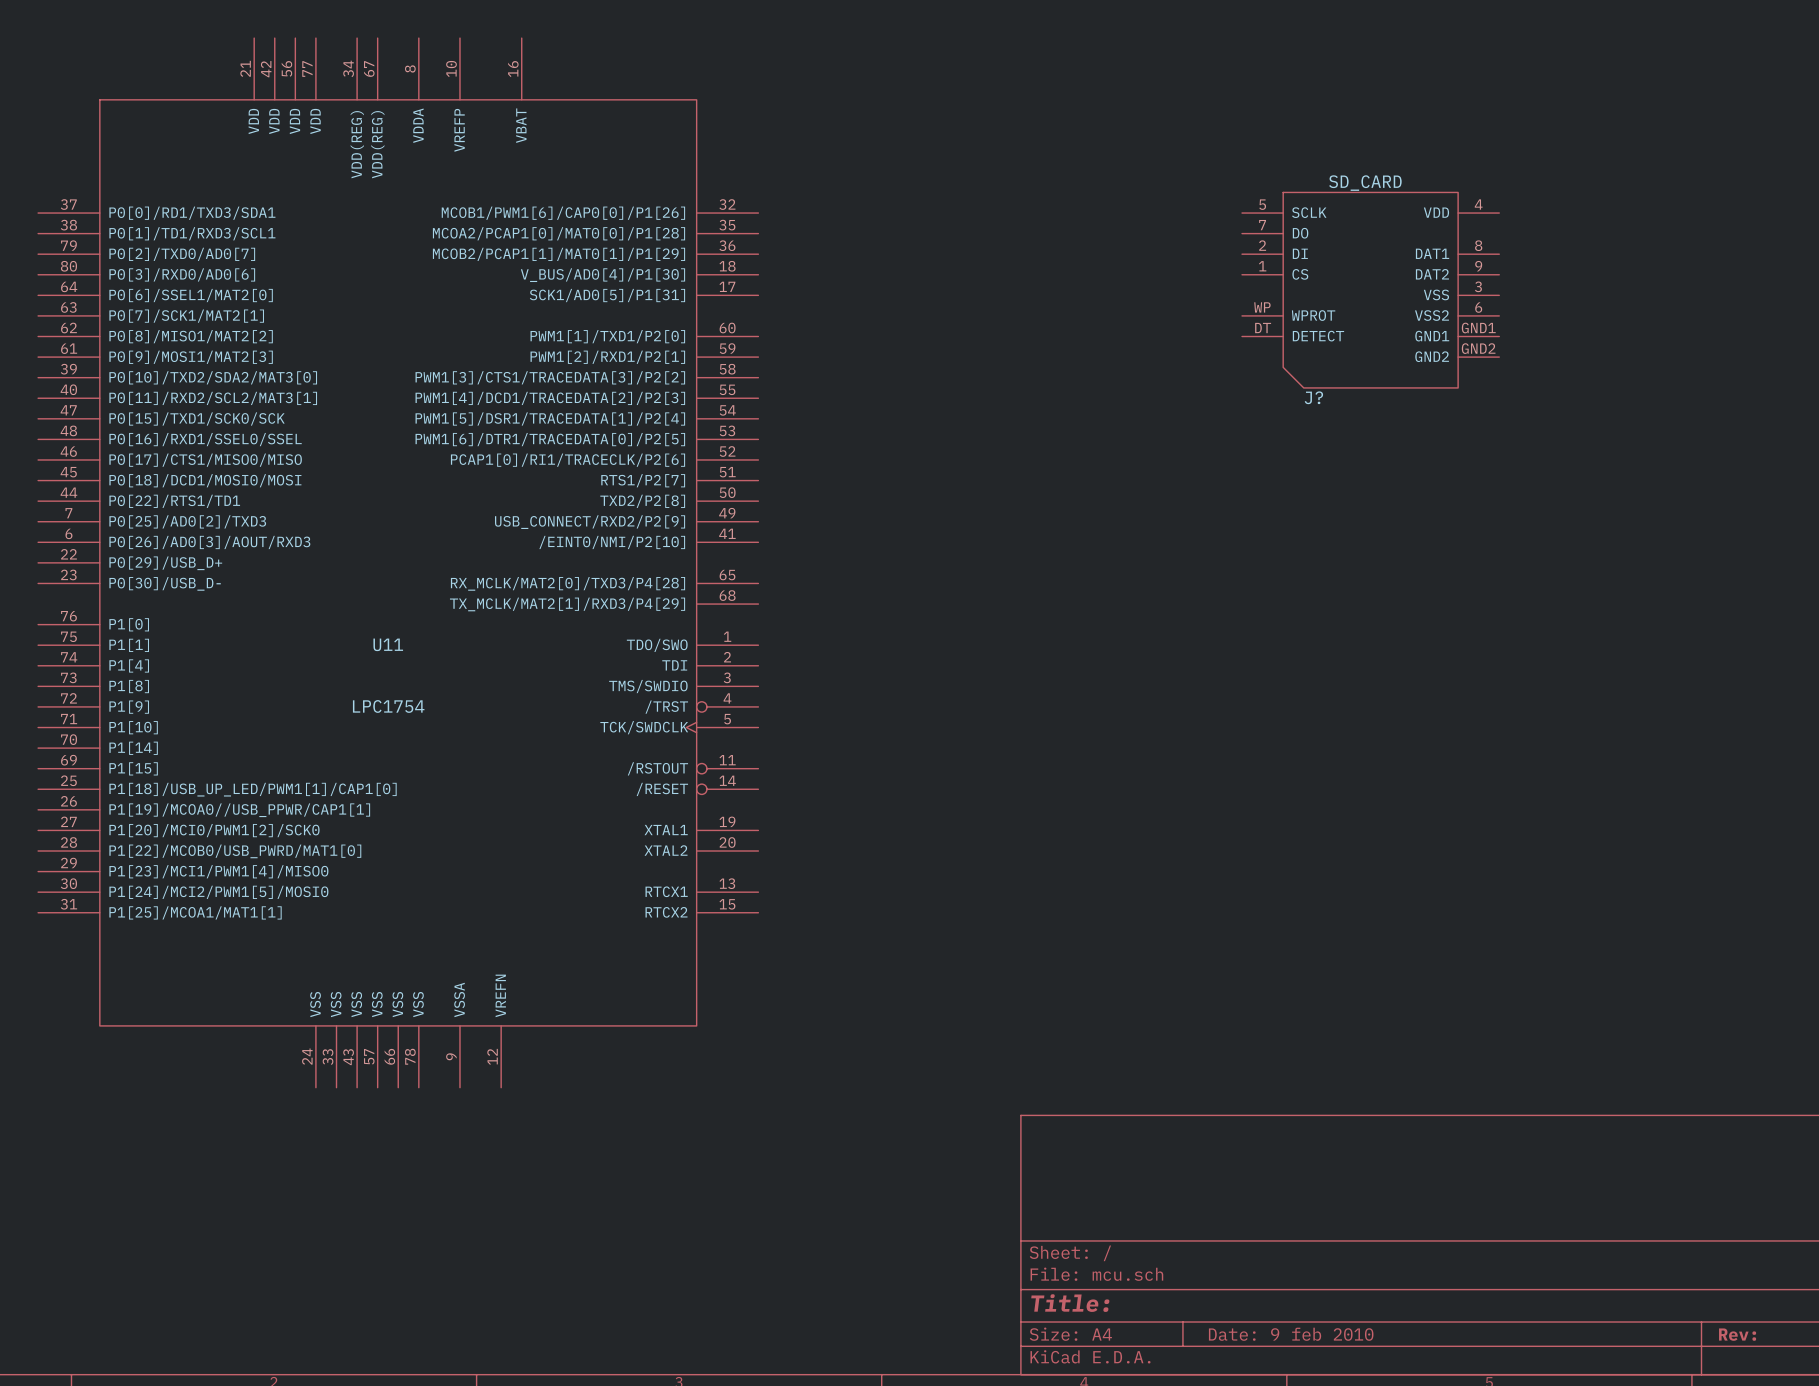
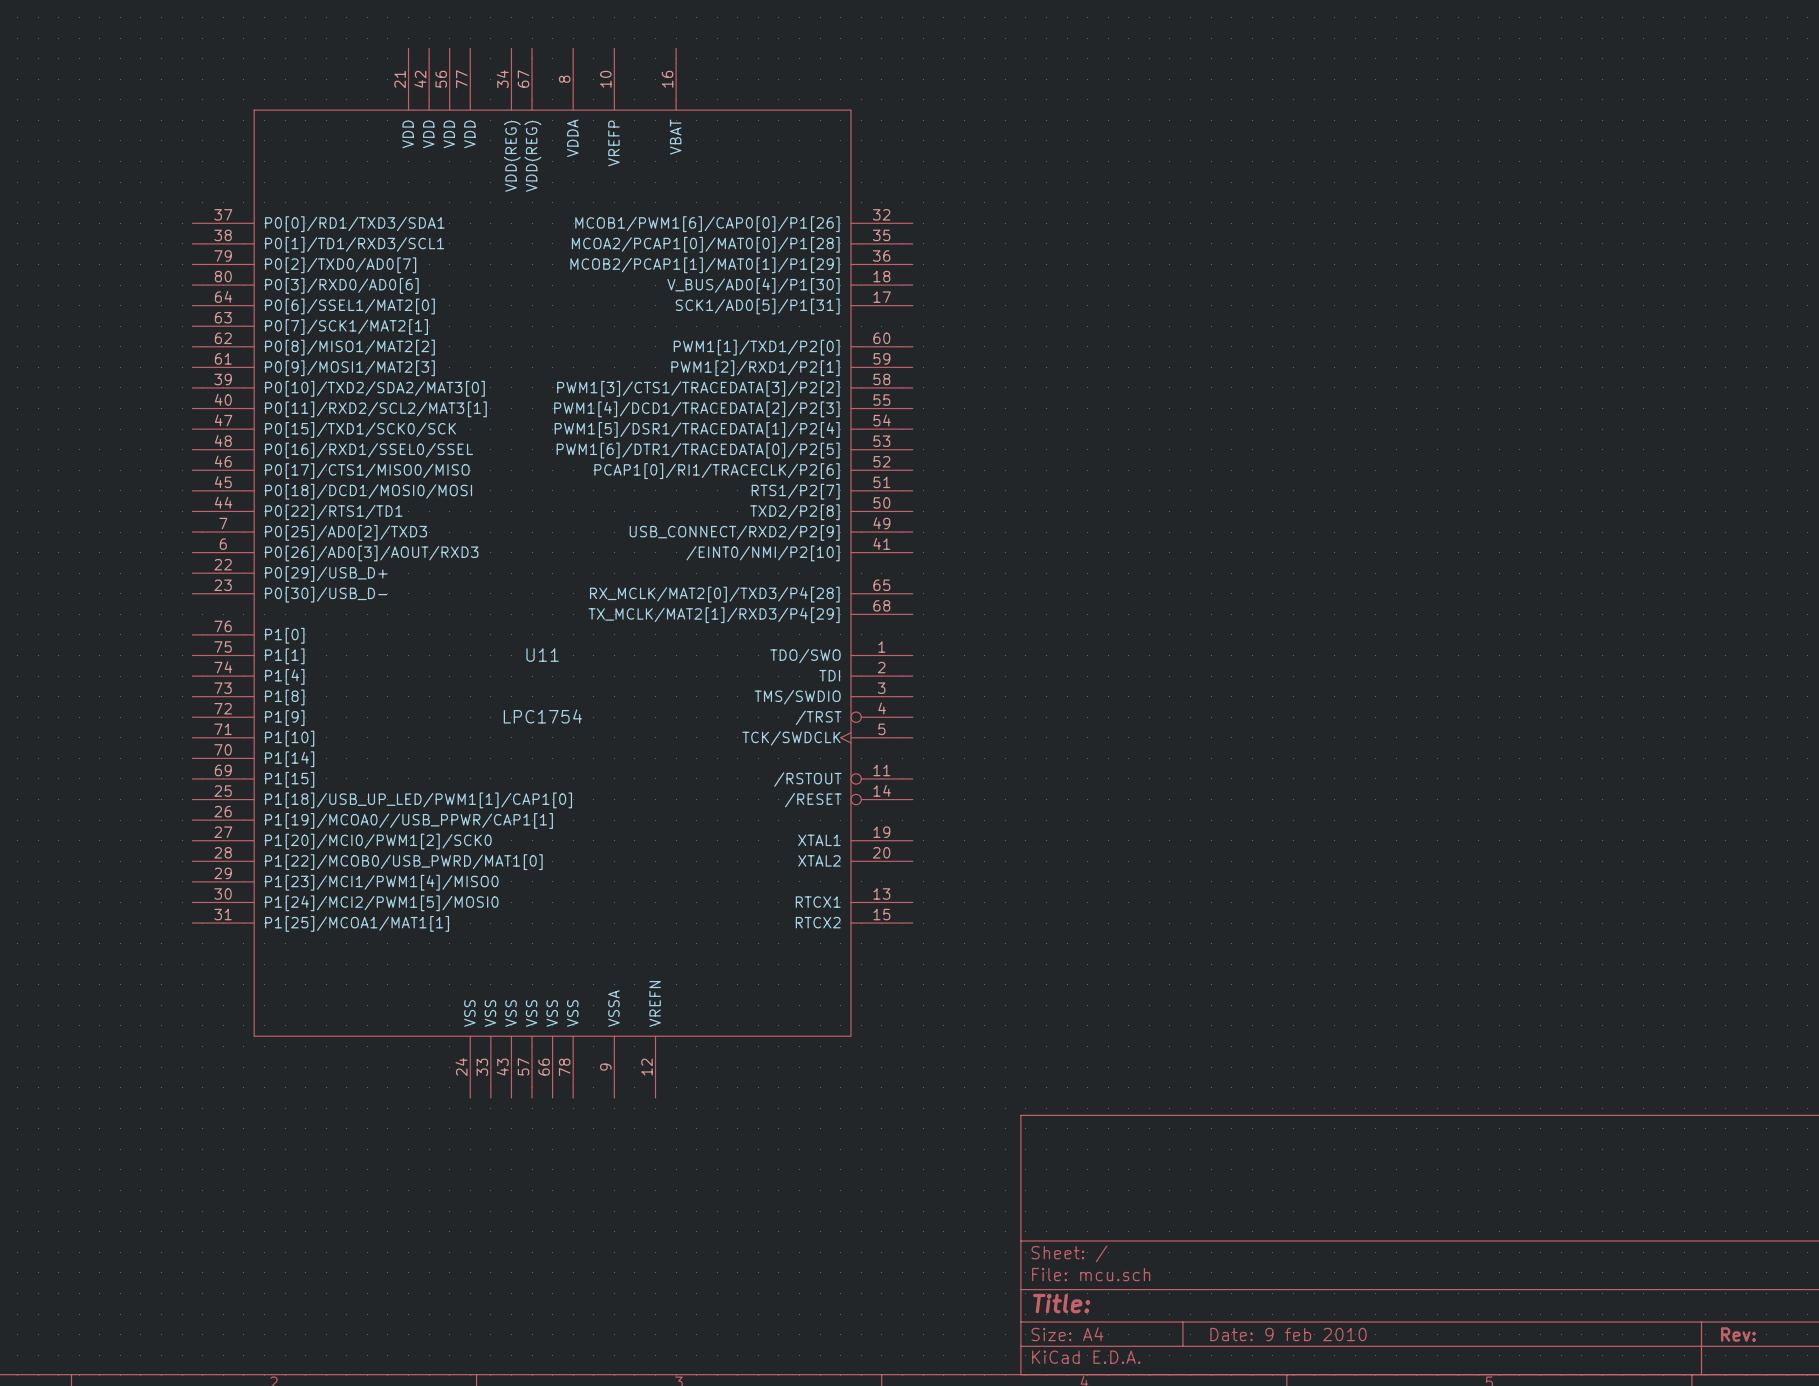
J?: SD_CARD (1370, 290) -> none
U11 position: (398, 562) -> (552, 573)

